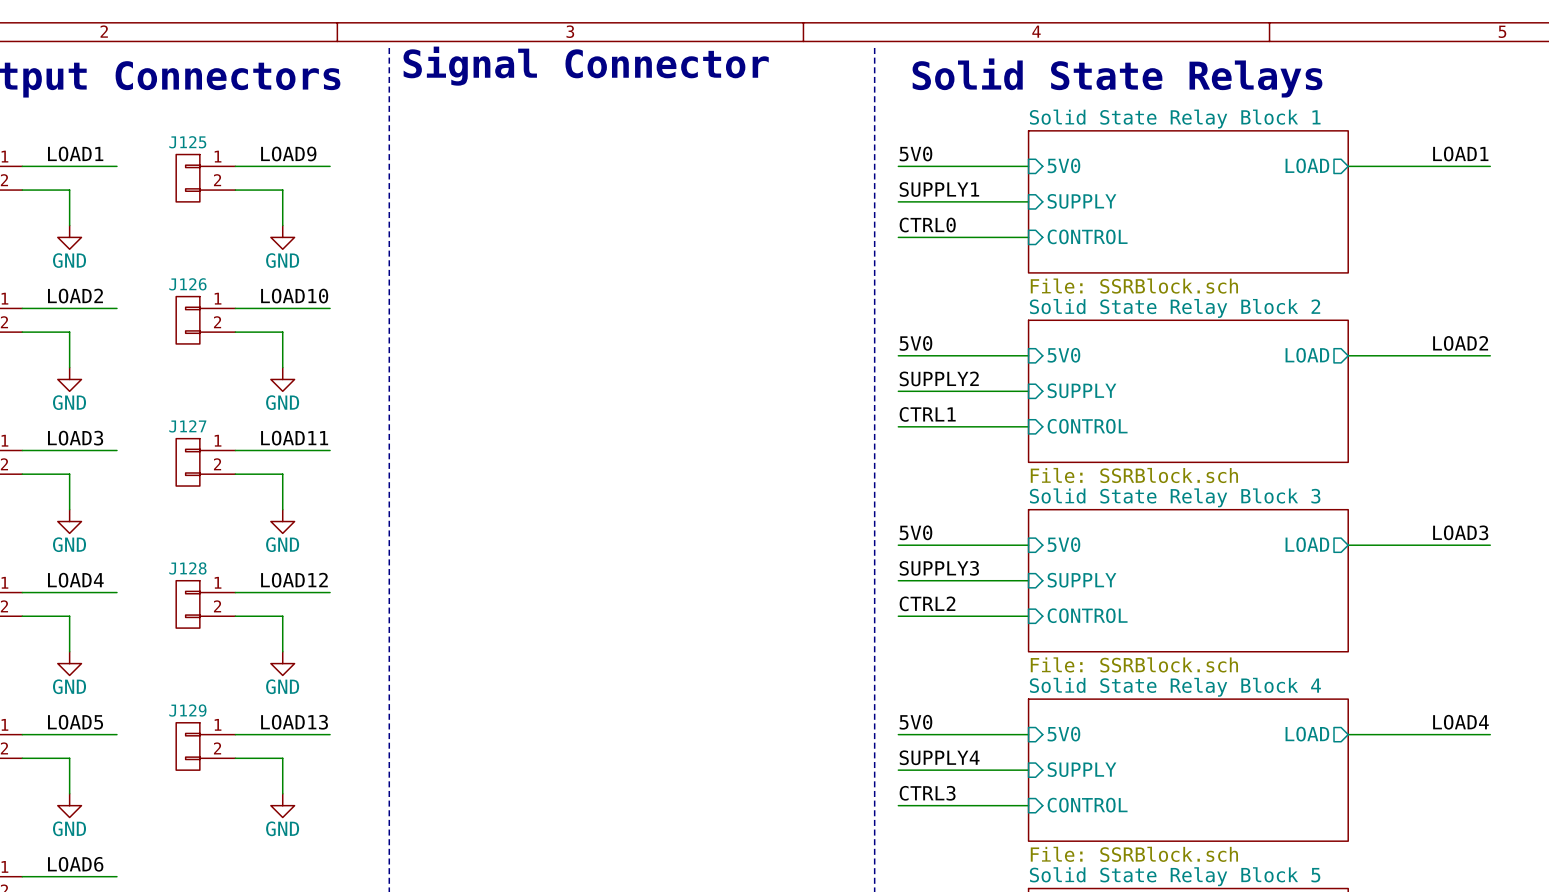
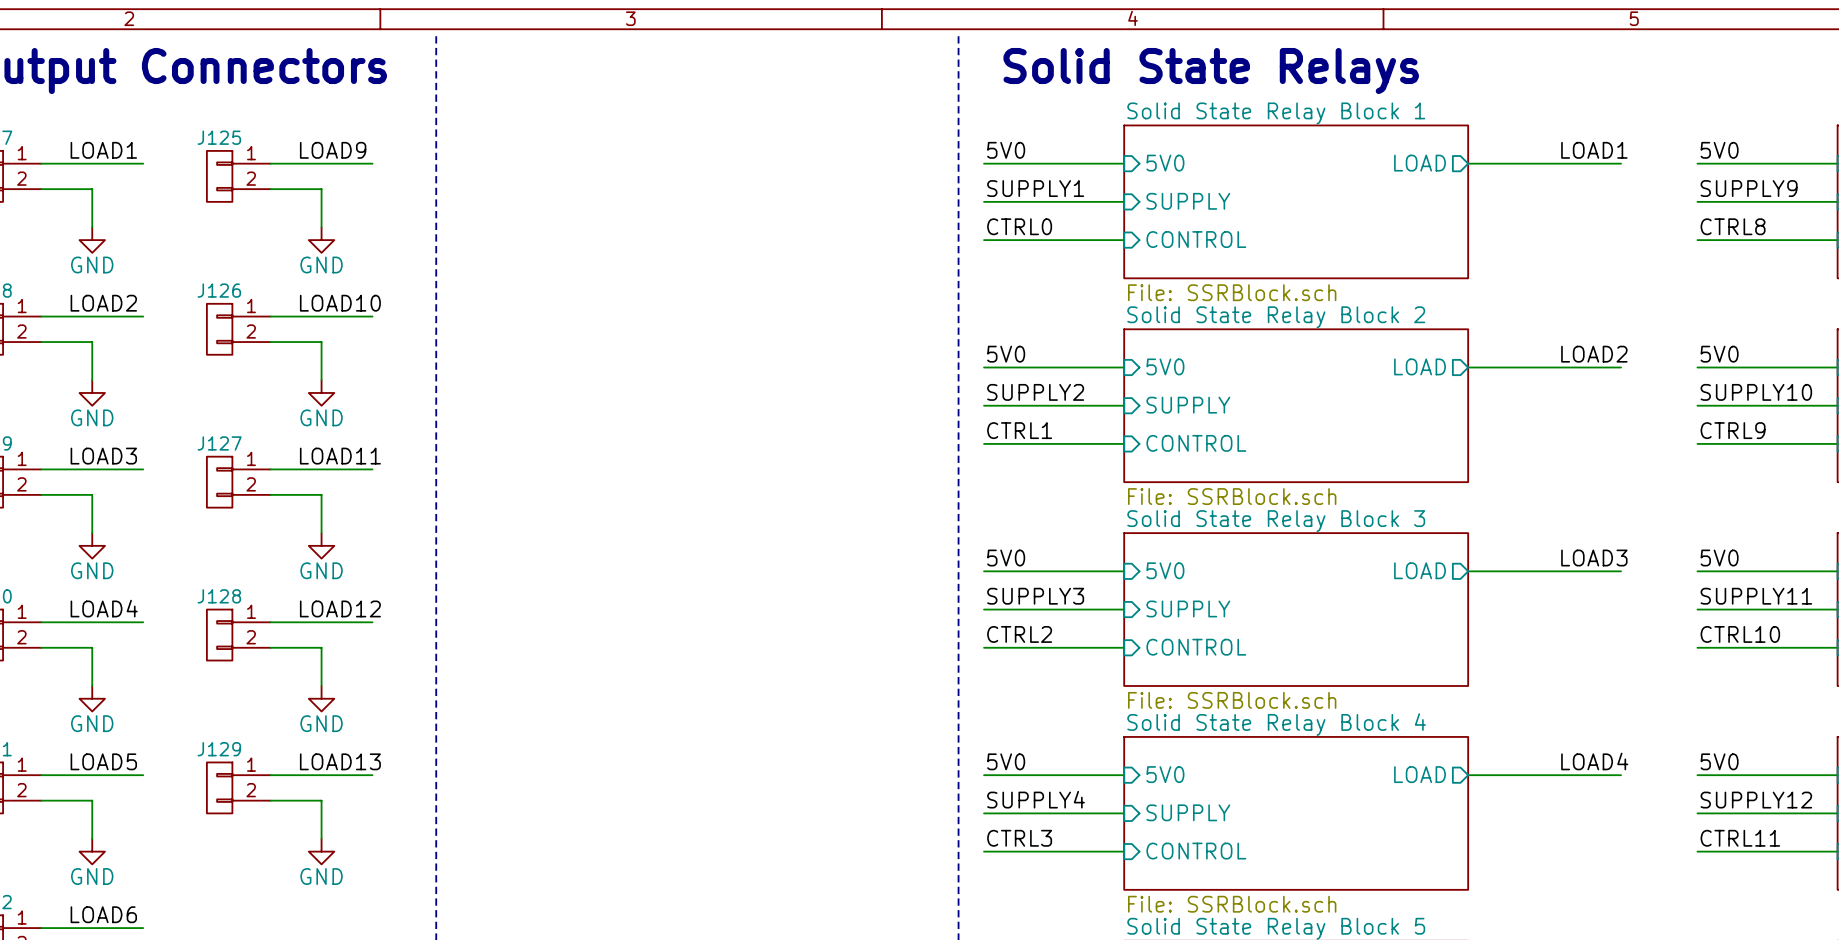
text: Signal Connector (586, 66) -> none

